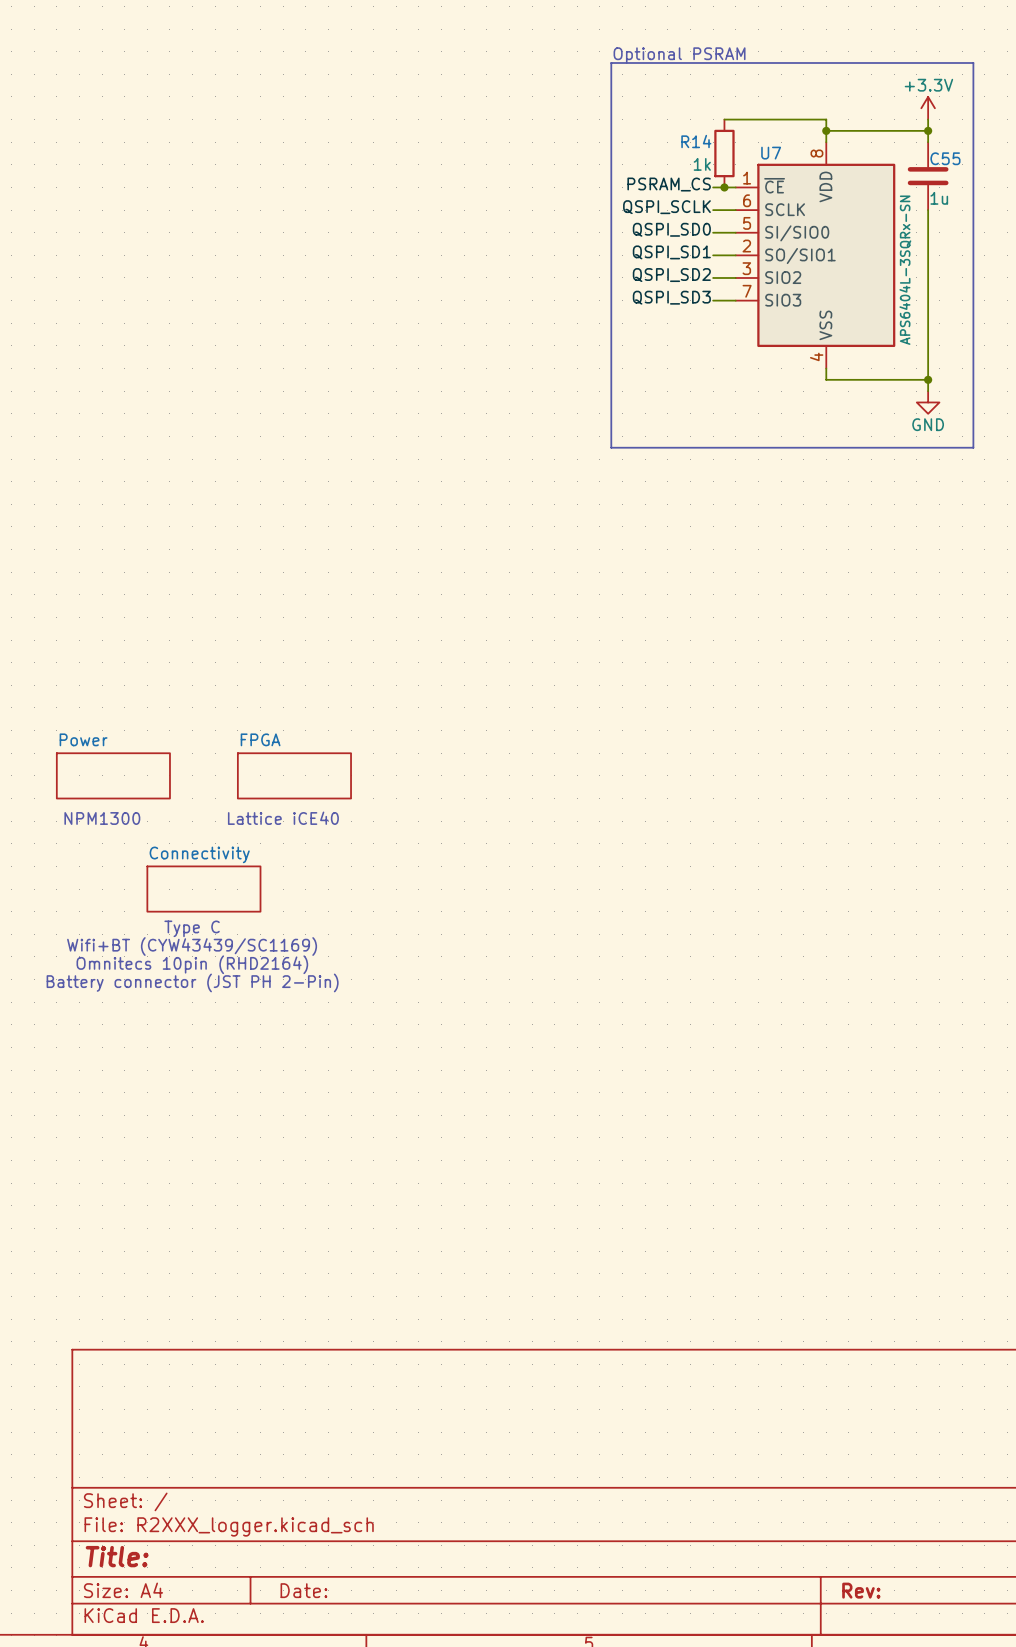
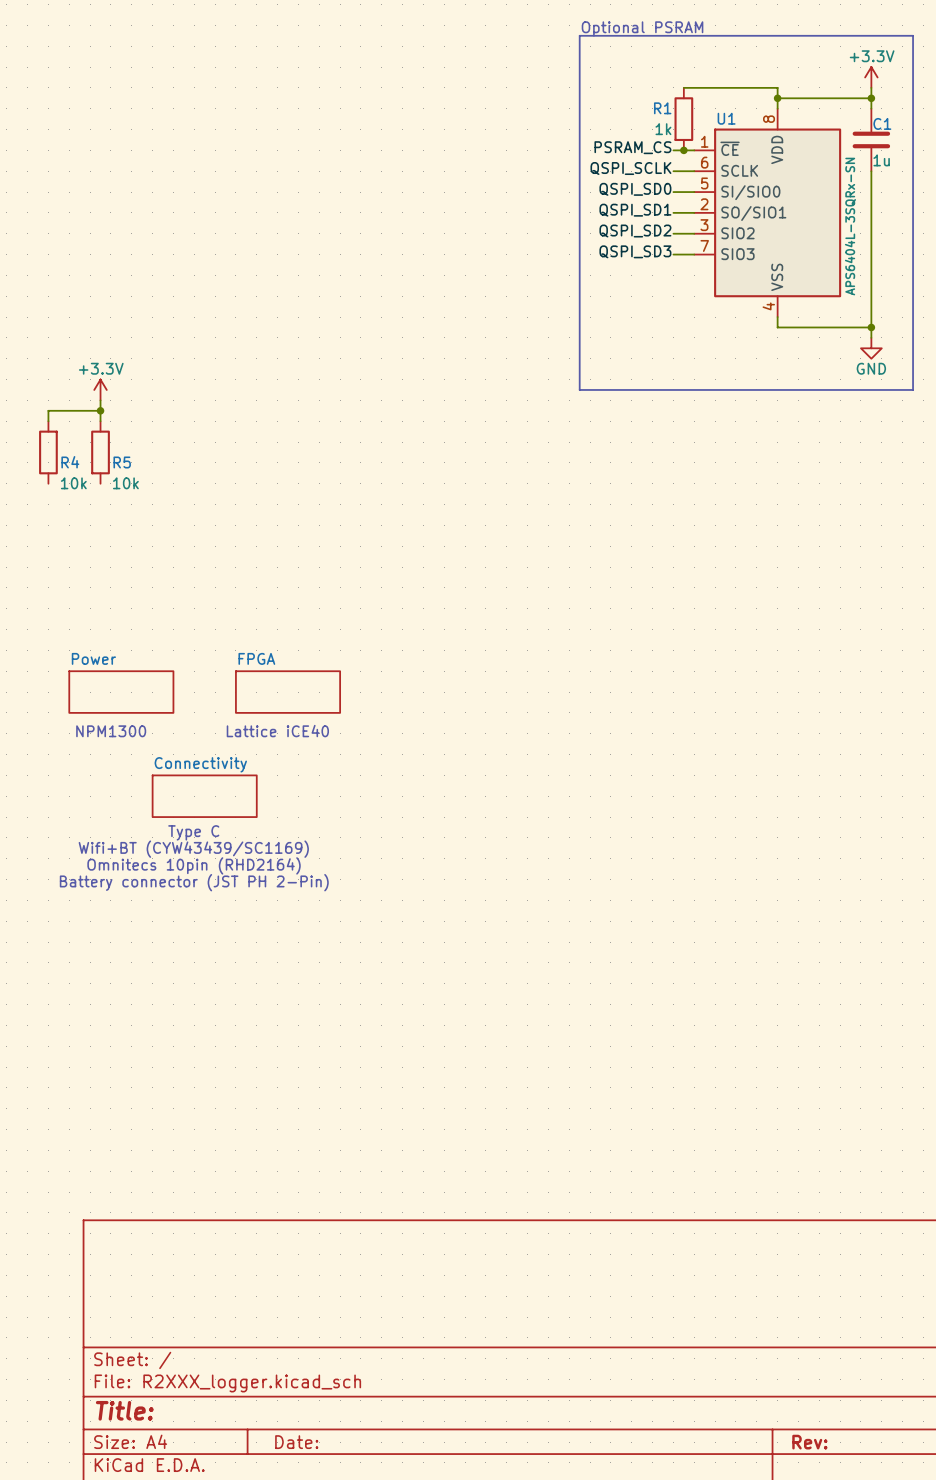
R14 name: R14 (696, 141) -> R1 (662, 108)
U7 name: U7 (771, 153) -> U1 (726, 118)
C55 name: C55 (945, 158) -> C1 (882, 123)
power symbol: none -> +3.3V (100, 389)
wire: none -> (100, 400) (100, 421)
wire: none -> (100, 410) (48, 410) (48, 421)
junction: none -> (100, 410)
R4: none -> 10k (48, 452)
R5: none -> 10k (100, 452)

